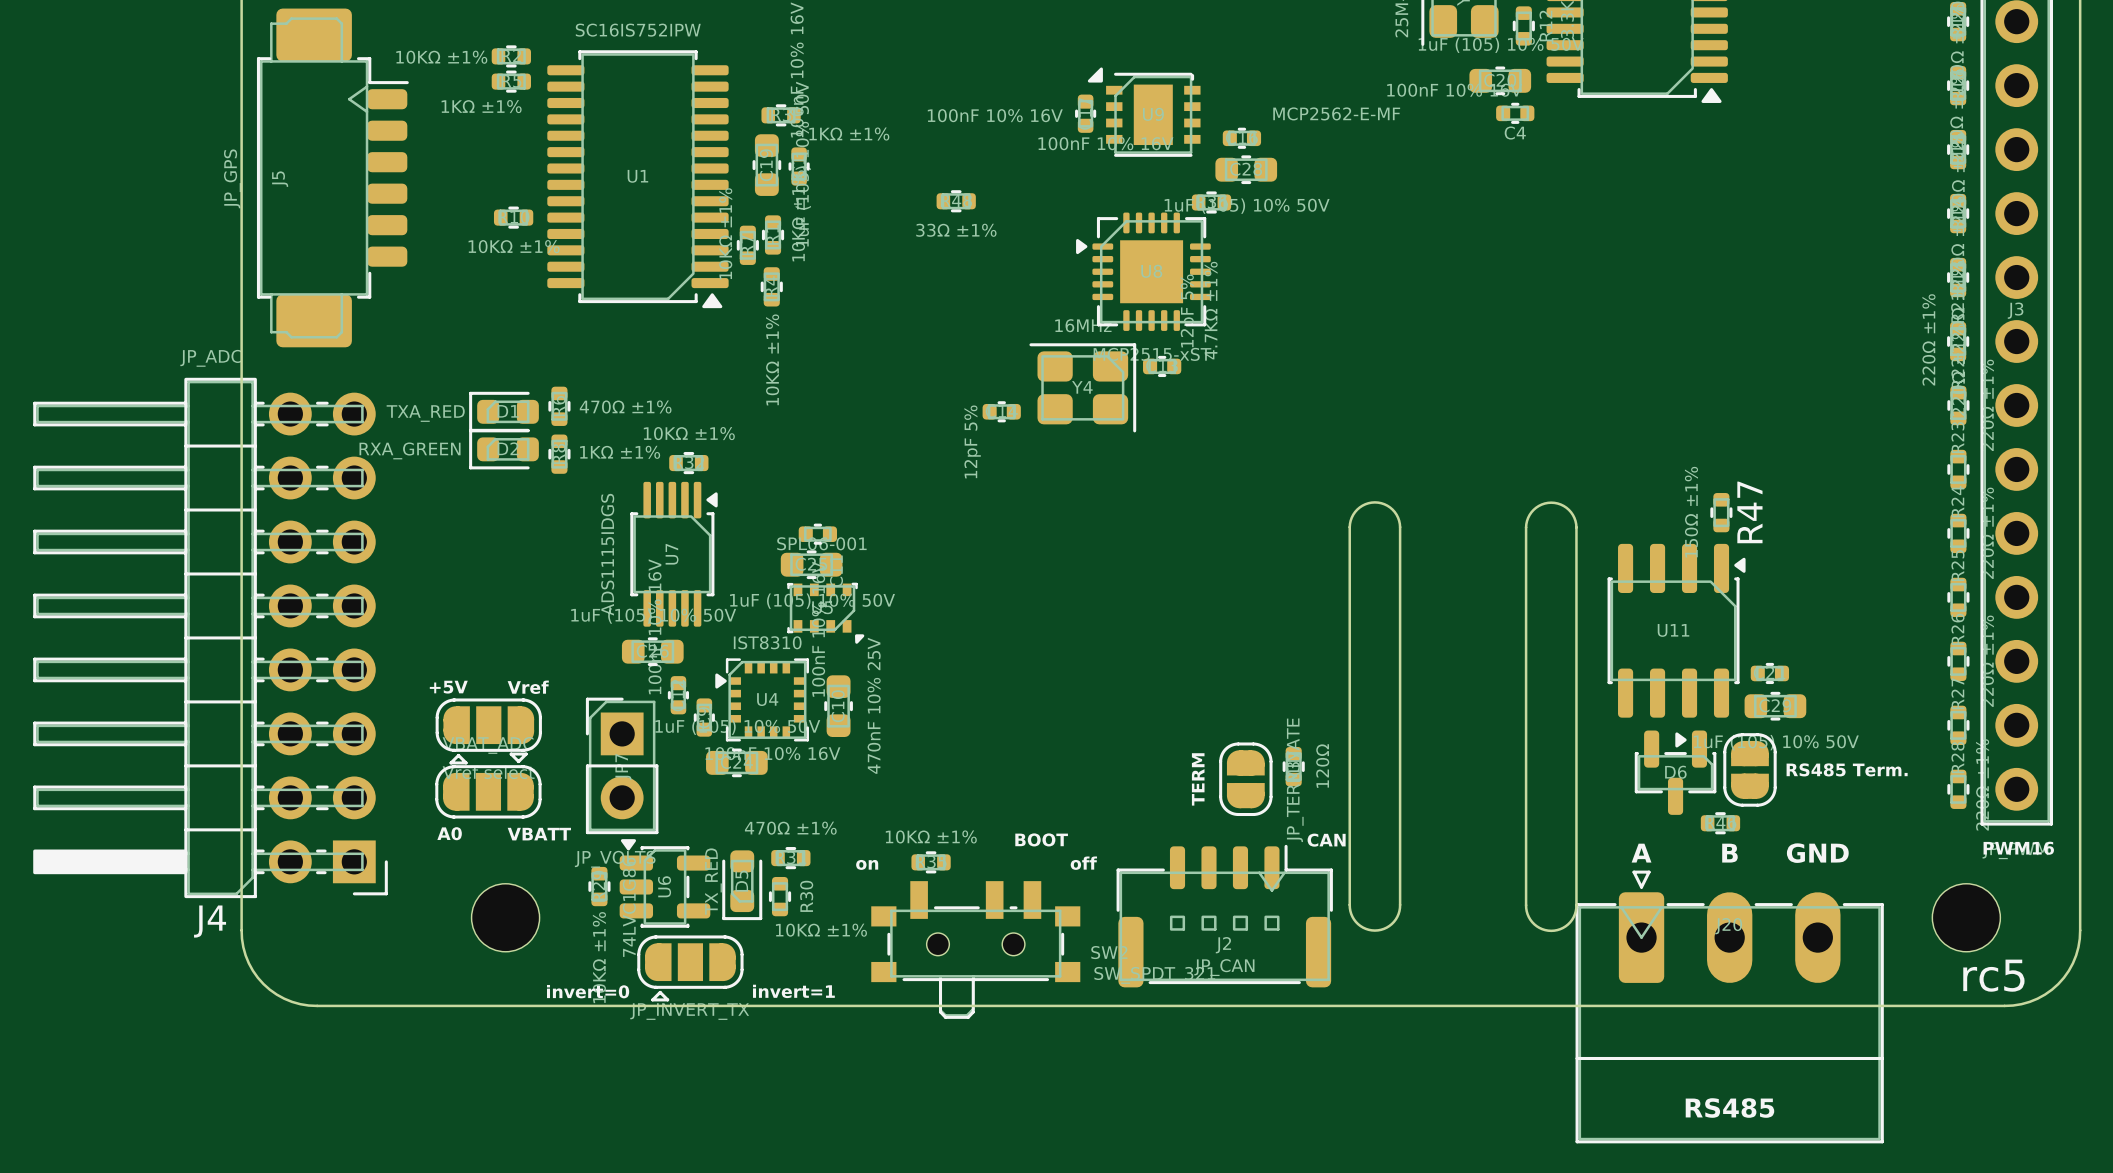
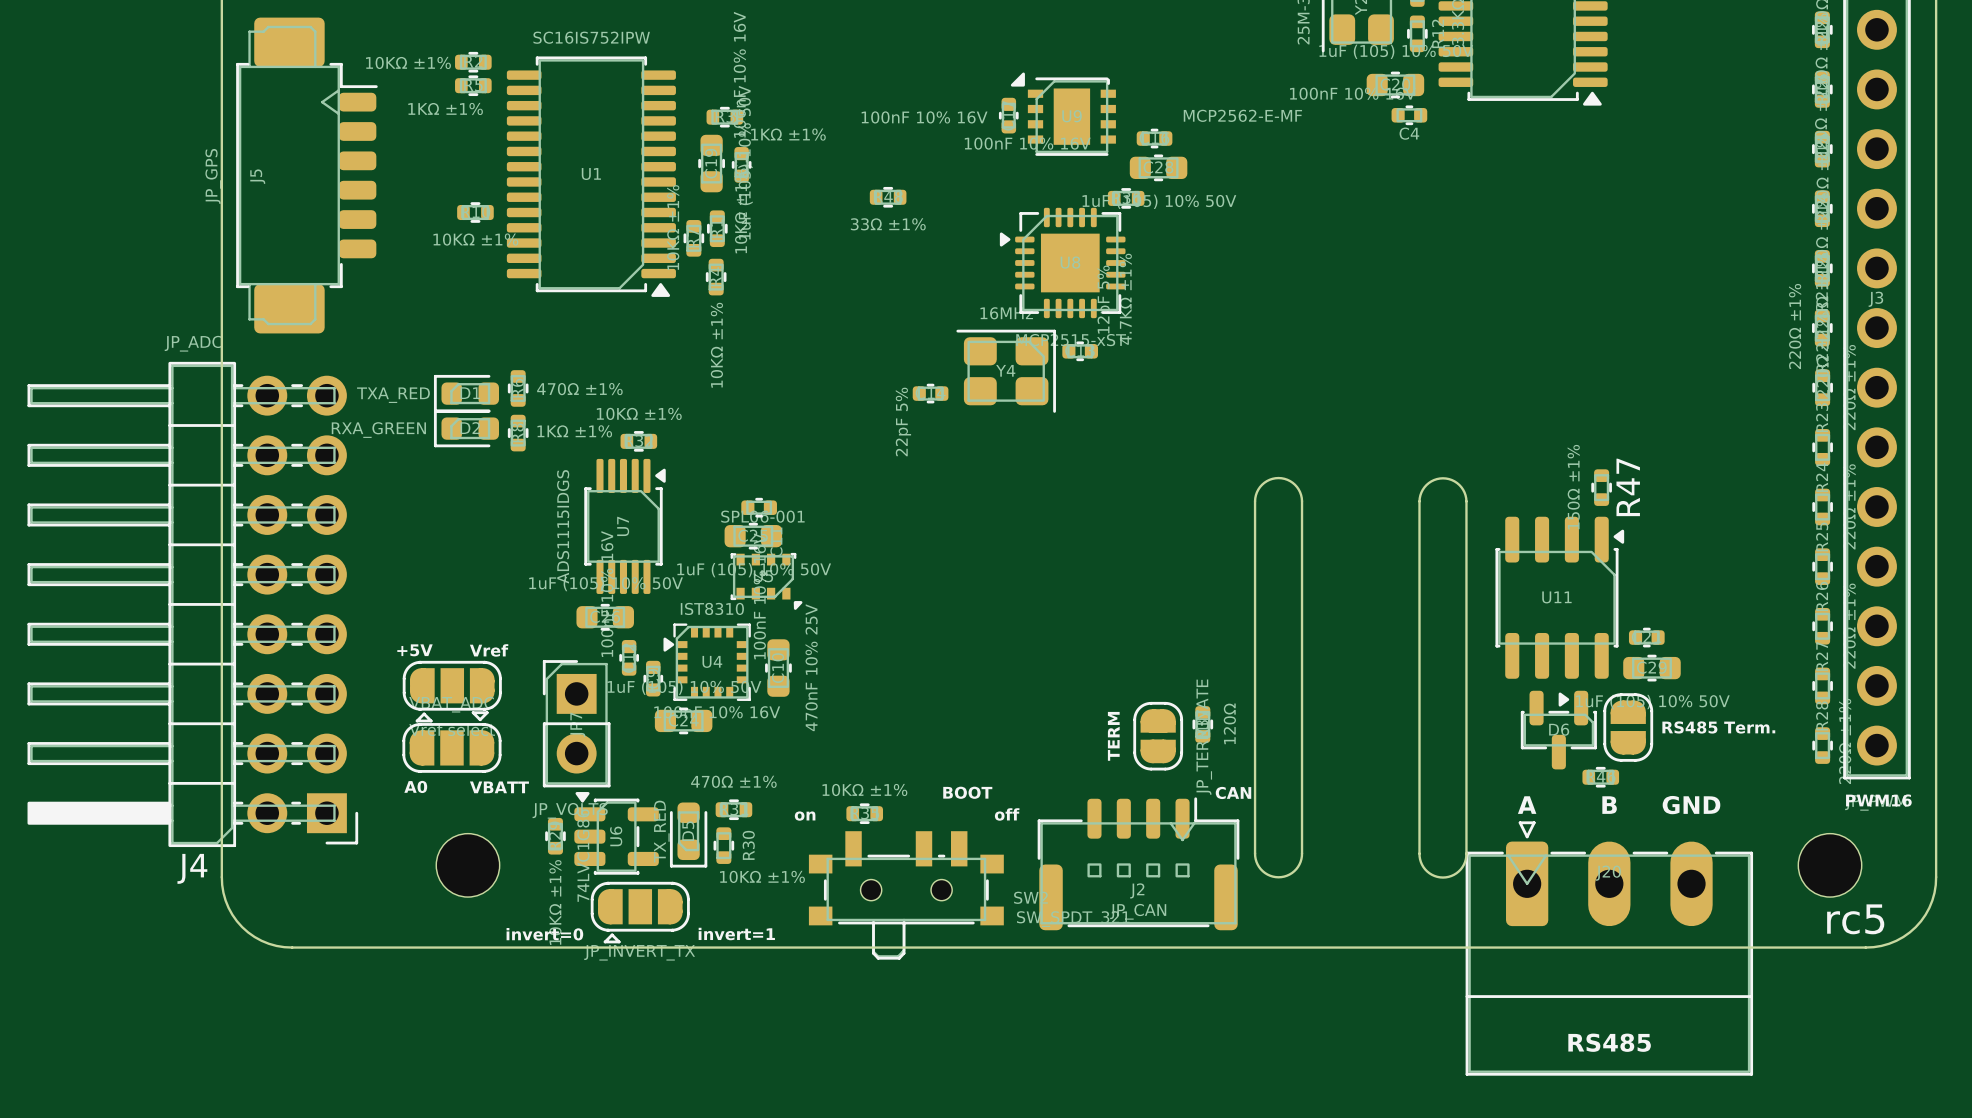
part value: 12pF 5% (972, 441) -> 22pF 5% (903, 421)

